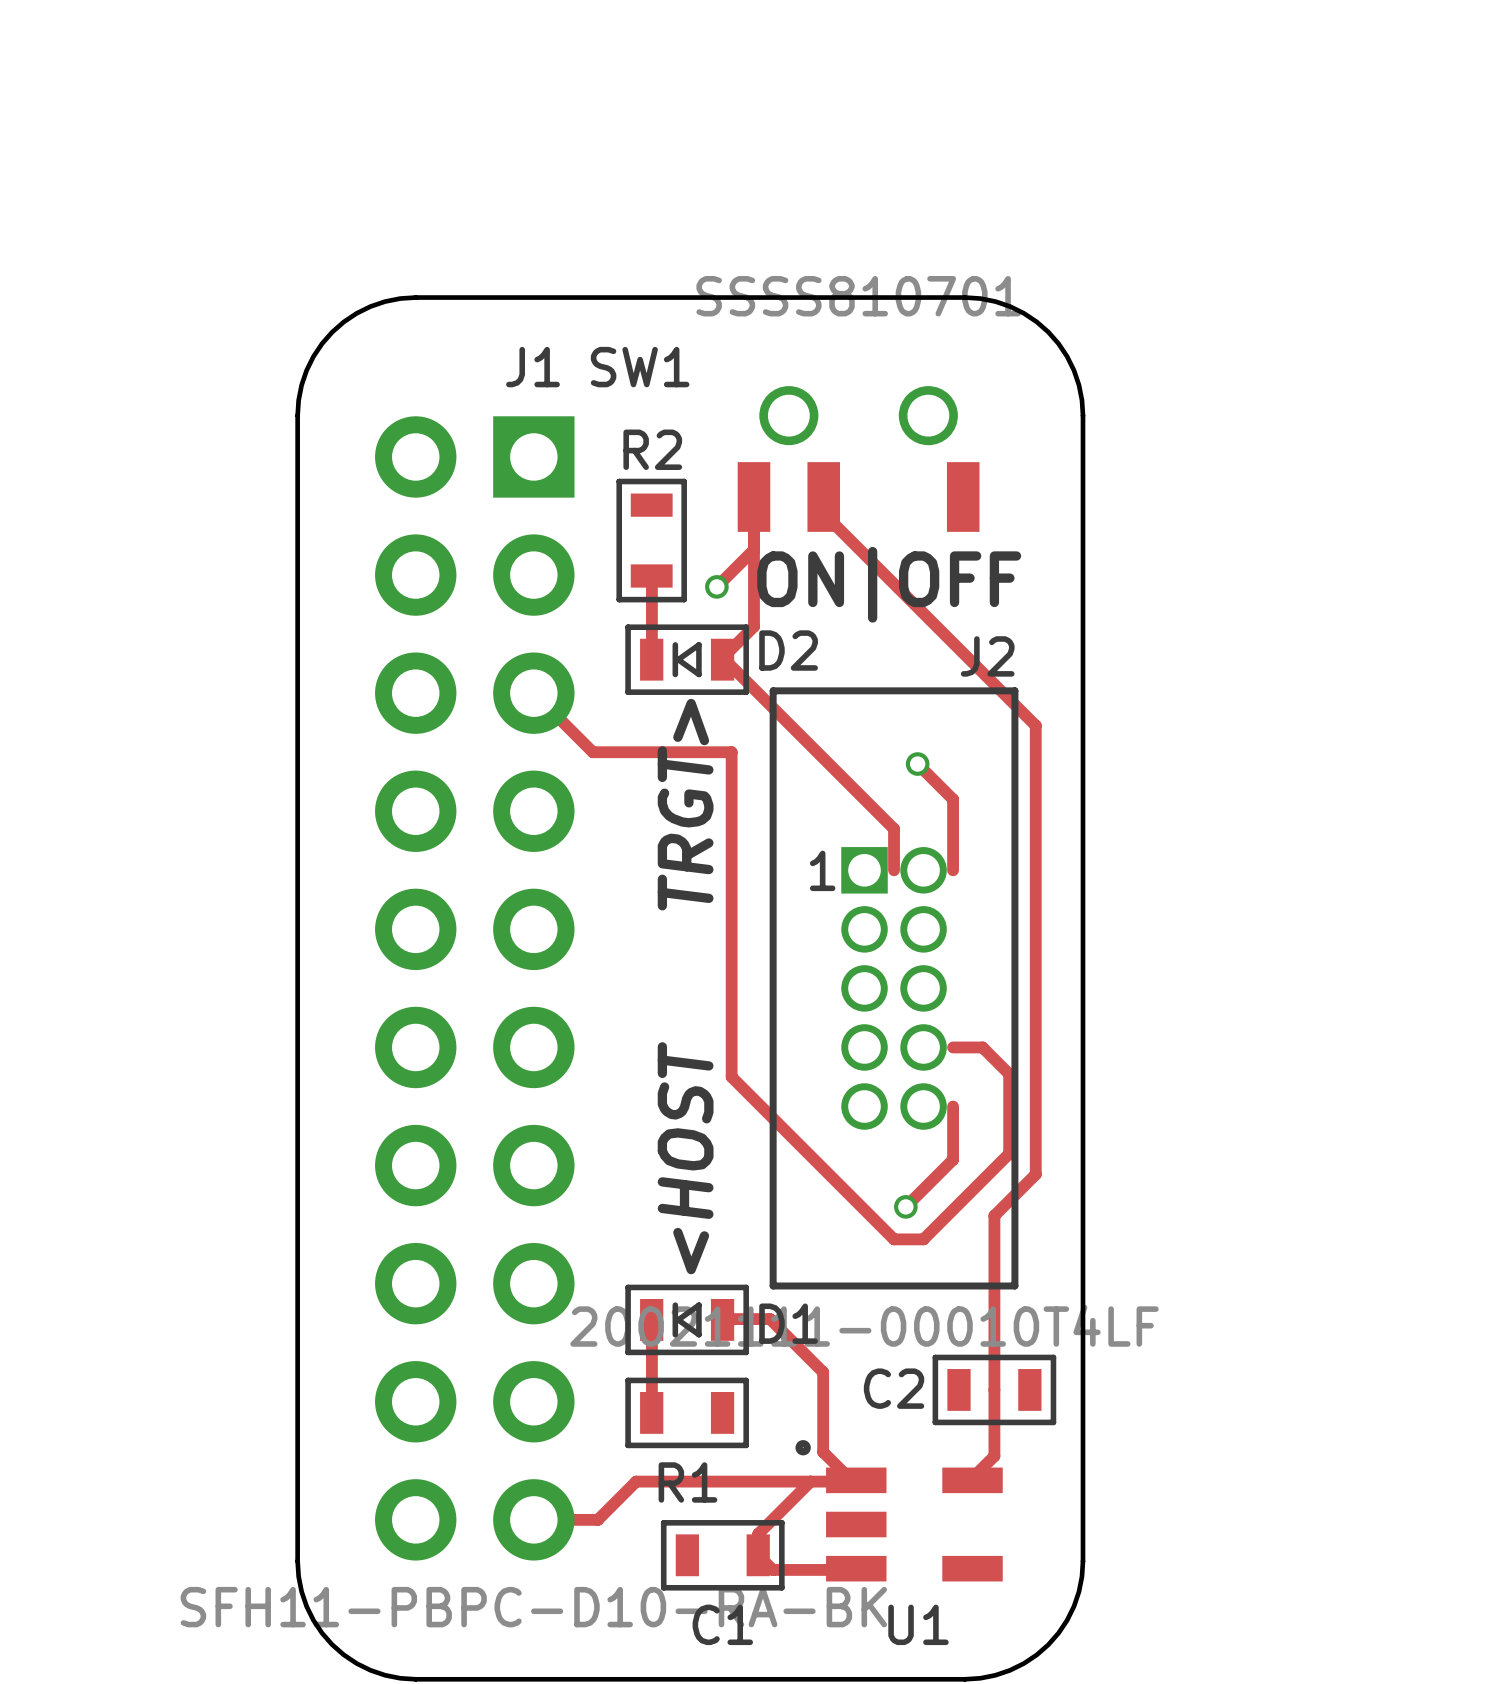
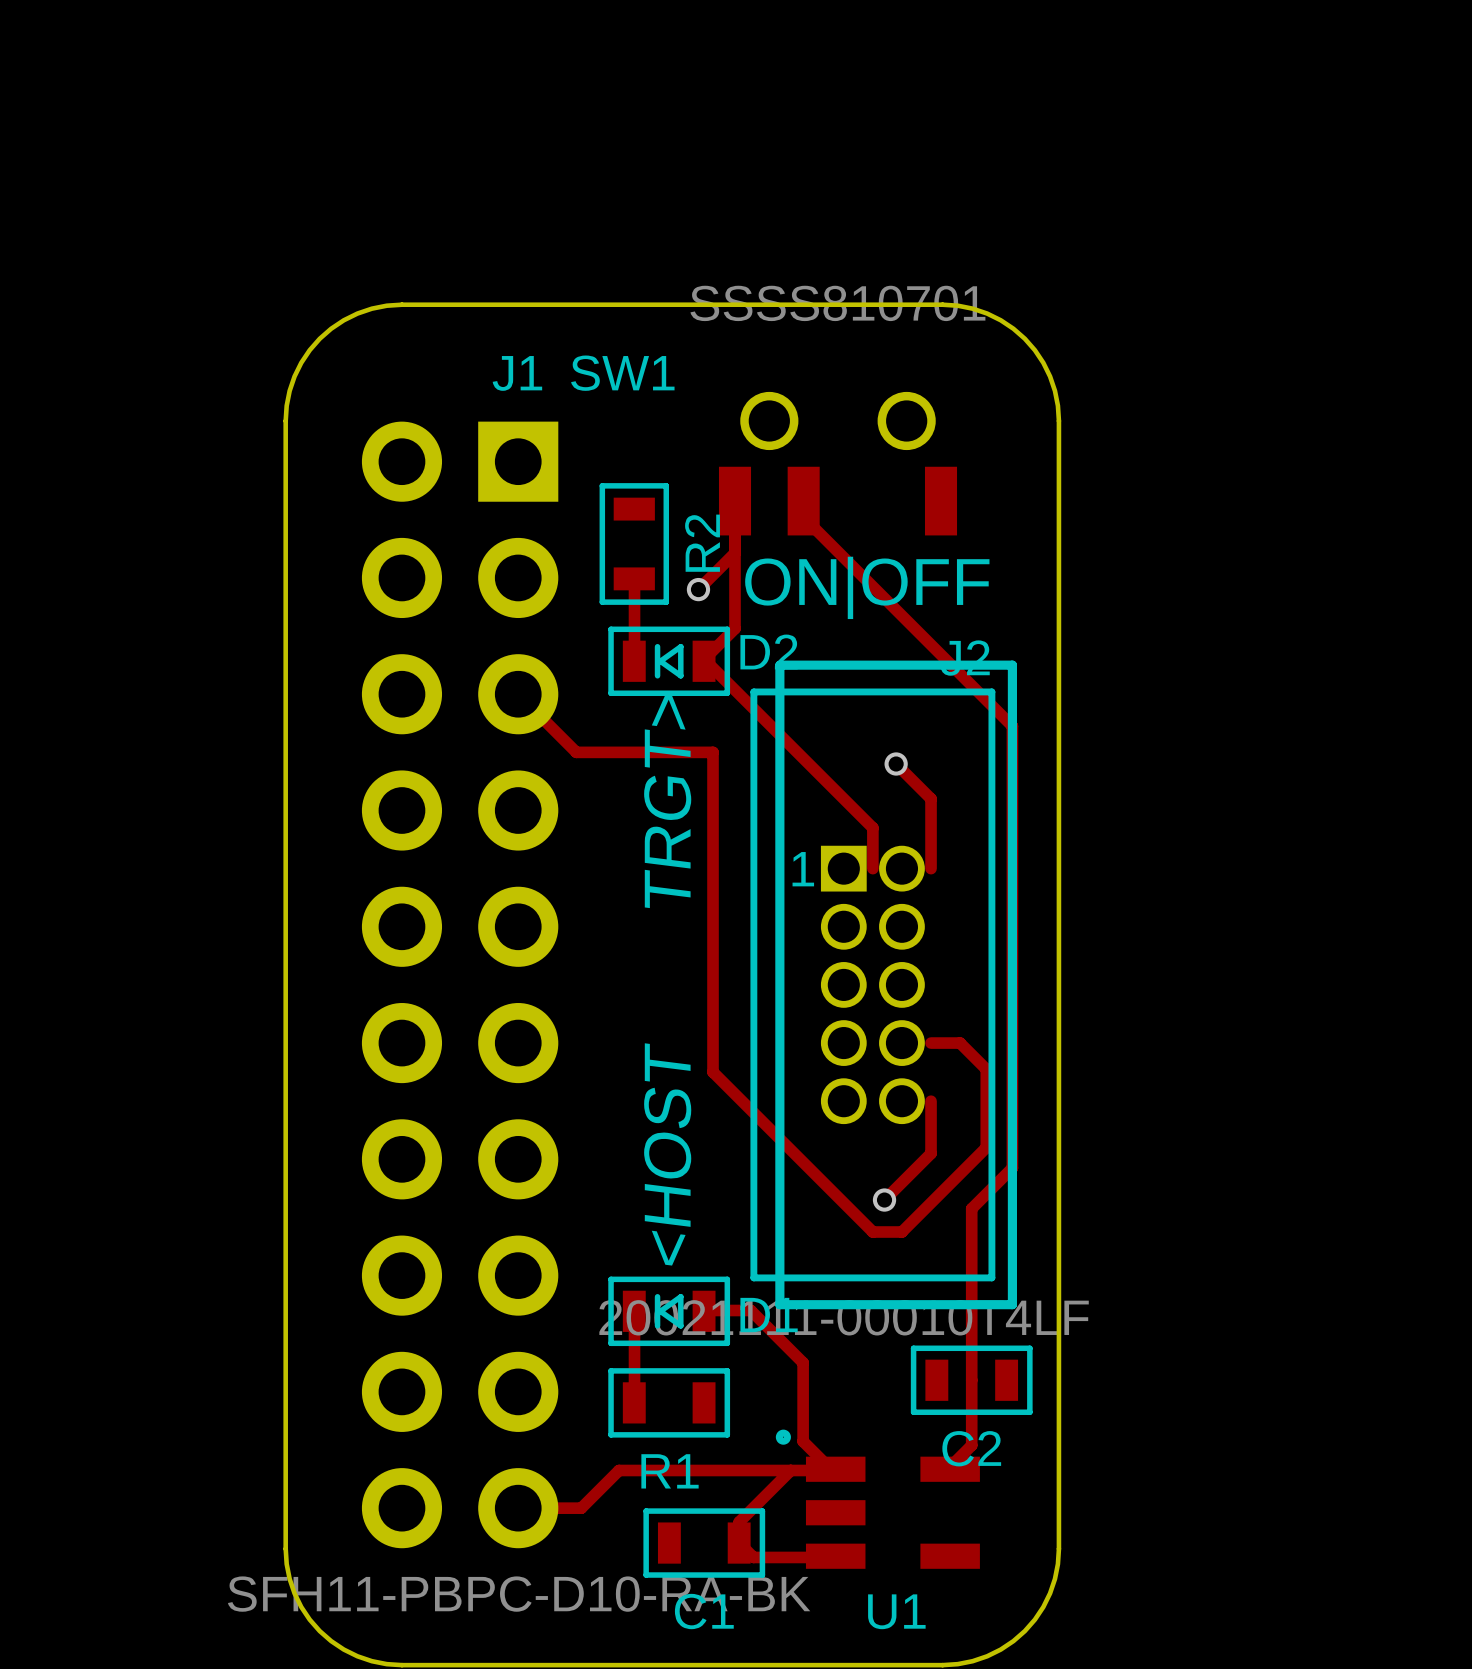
R2 name rotation: 0° (652, 449) -> 90° counterclockwise (702, 543)
R2 name position: R2 (652, 449) -> R2 (702, 543)
line: none -> (779, 665) (1012, 665) (1012, 1304) (779, 1304) (779, 665)
C2 name position: C2 (894, 1388) -> C2 (971, 1448)

